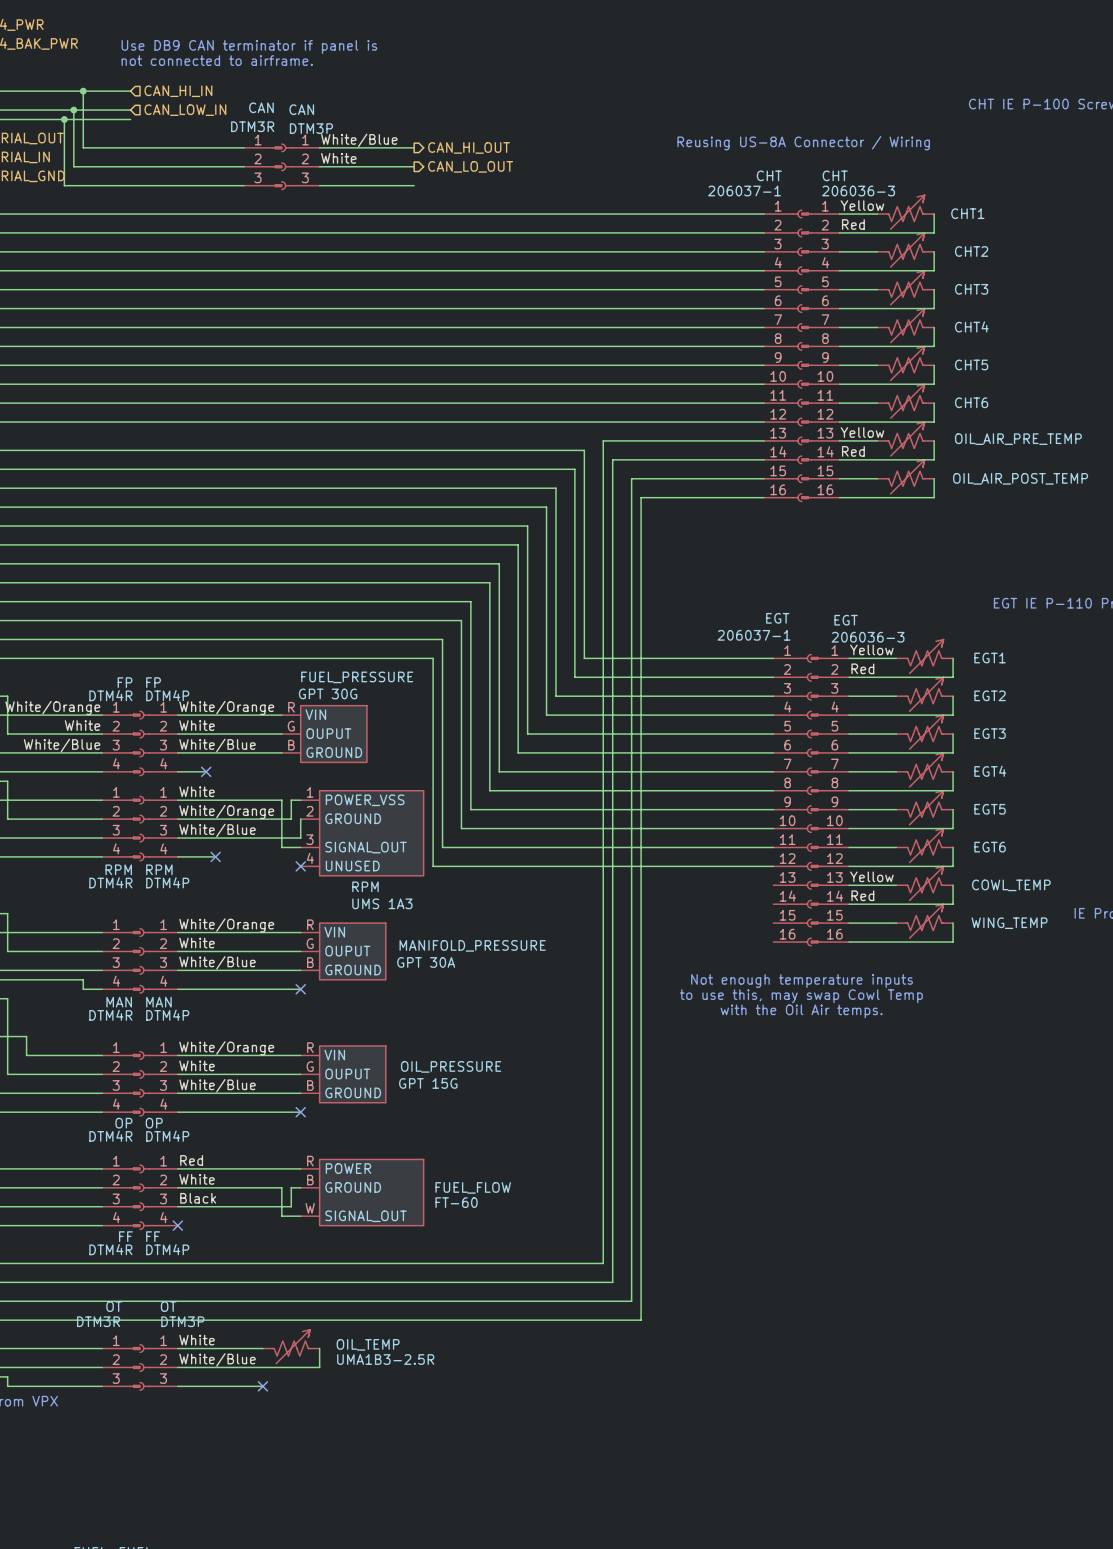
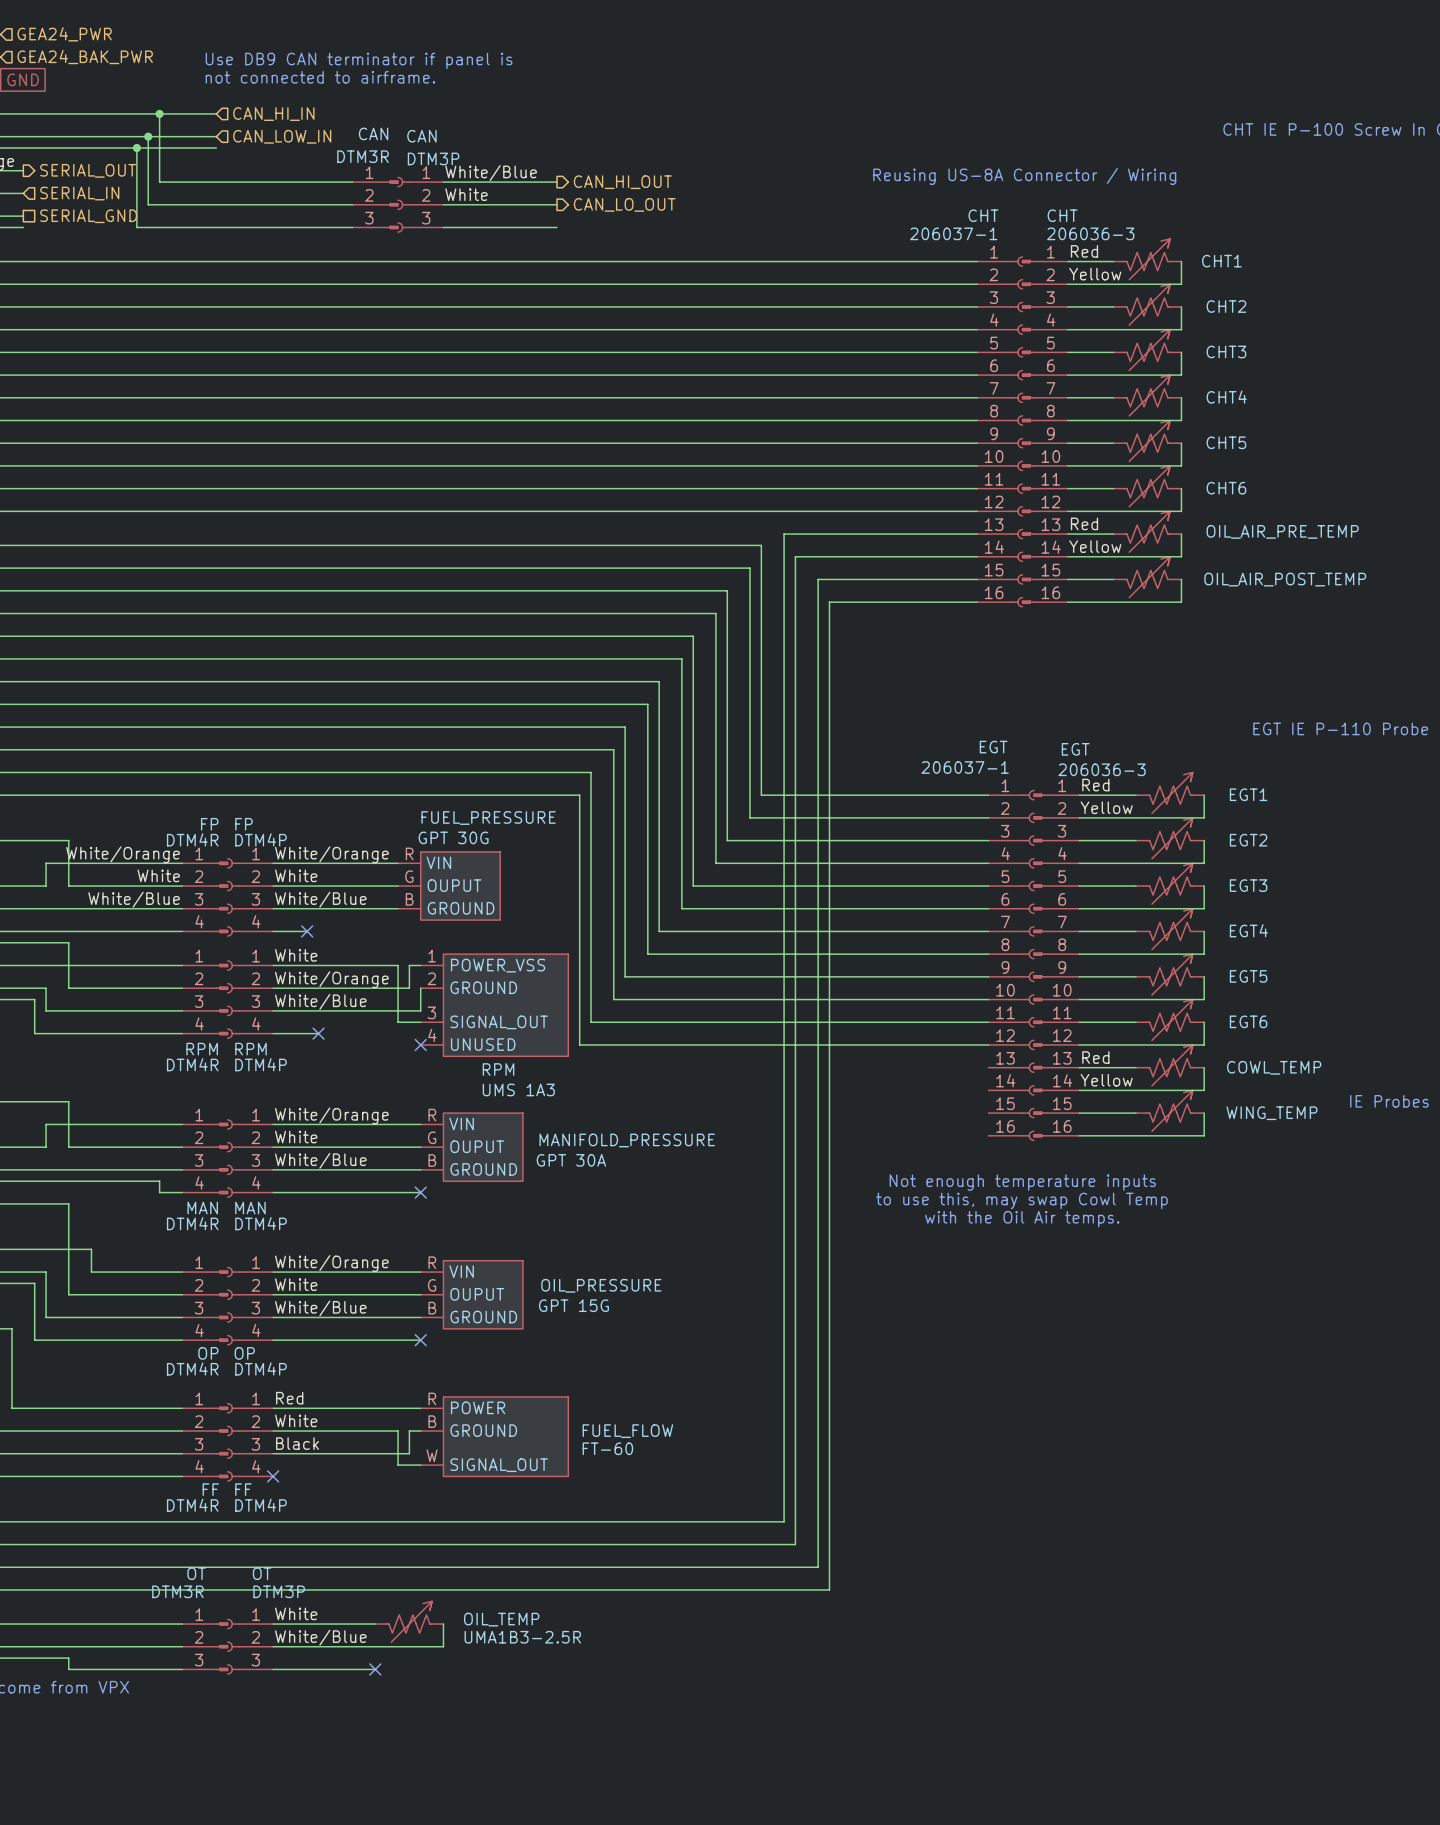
label: Yellow (862, 205) -> Red (1084, 251)
label: Red (853, 224) -> Yellow (1095, 274)
label: Yellow (862, 432) -> Red (1084, 523)
label: Red (853, 451) -> Yellow (1095, 546)
label: Yellow (871, 649) -> Red (1095, 785)
label: Red (862, 668) -> Yellow (1106, 807)
label: Yellow (871, 876) -> Red (1095, 1057)
label: Red (862, 895) -> Yellow (1106, 1080)

